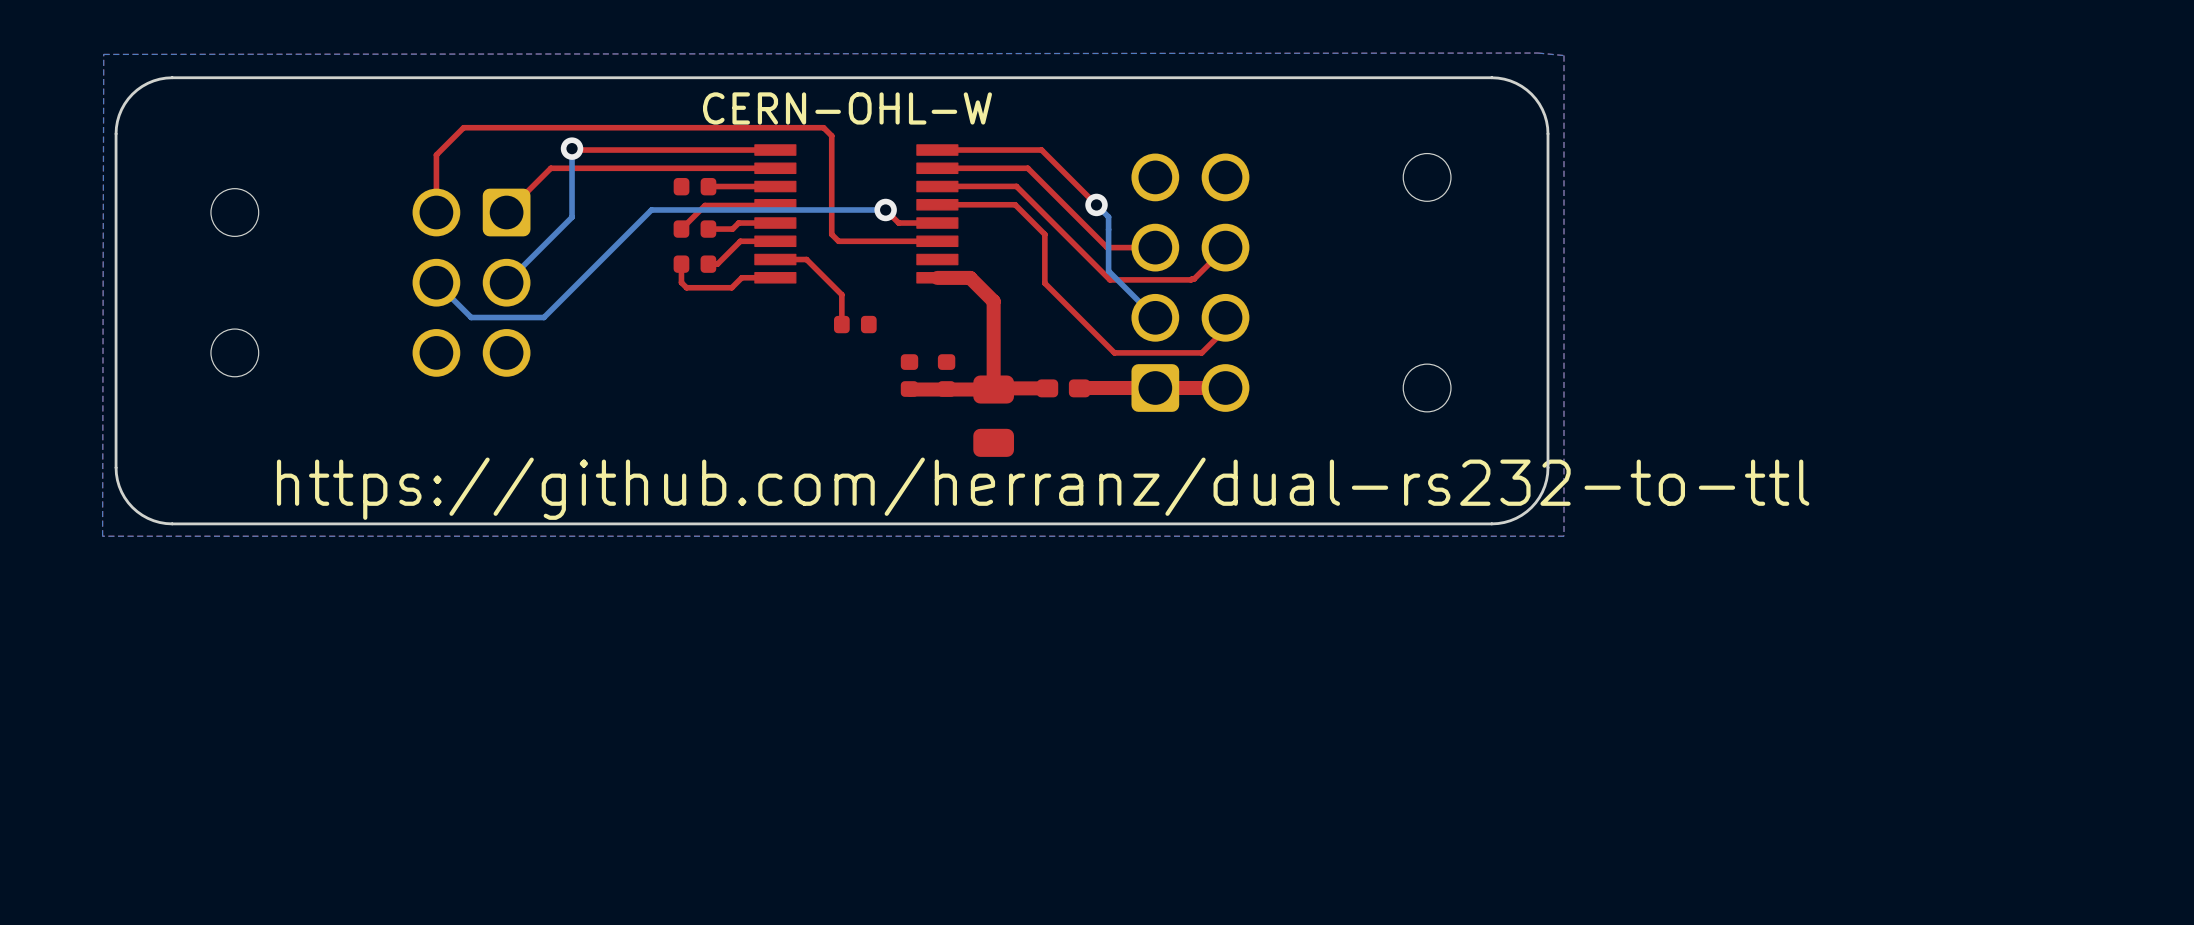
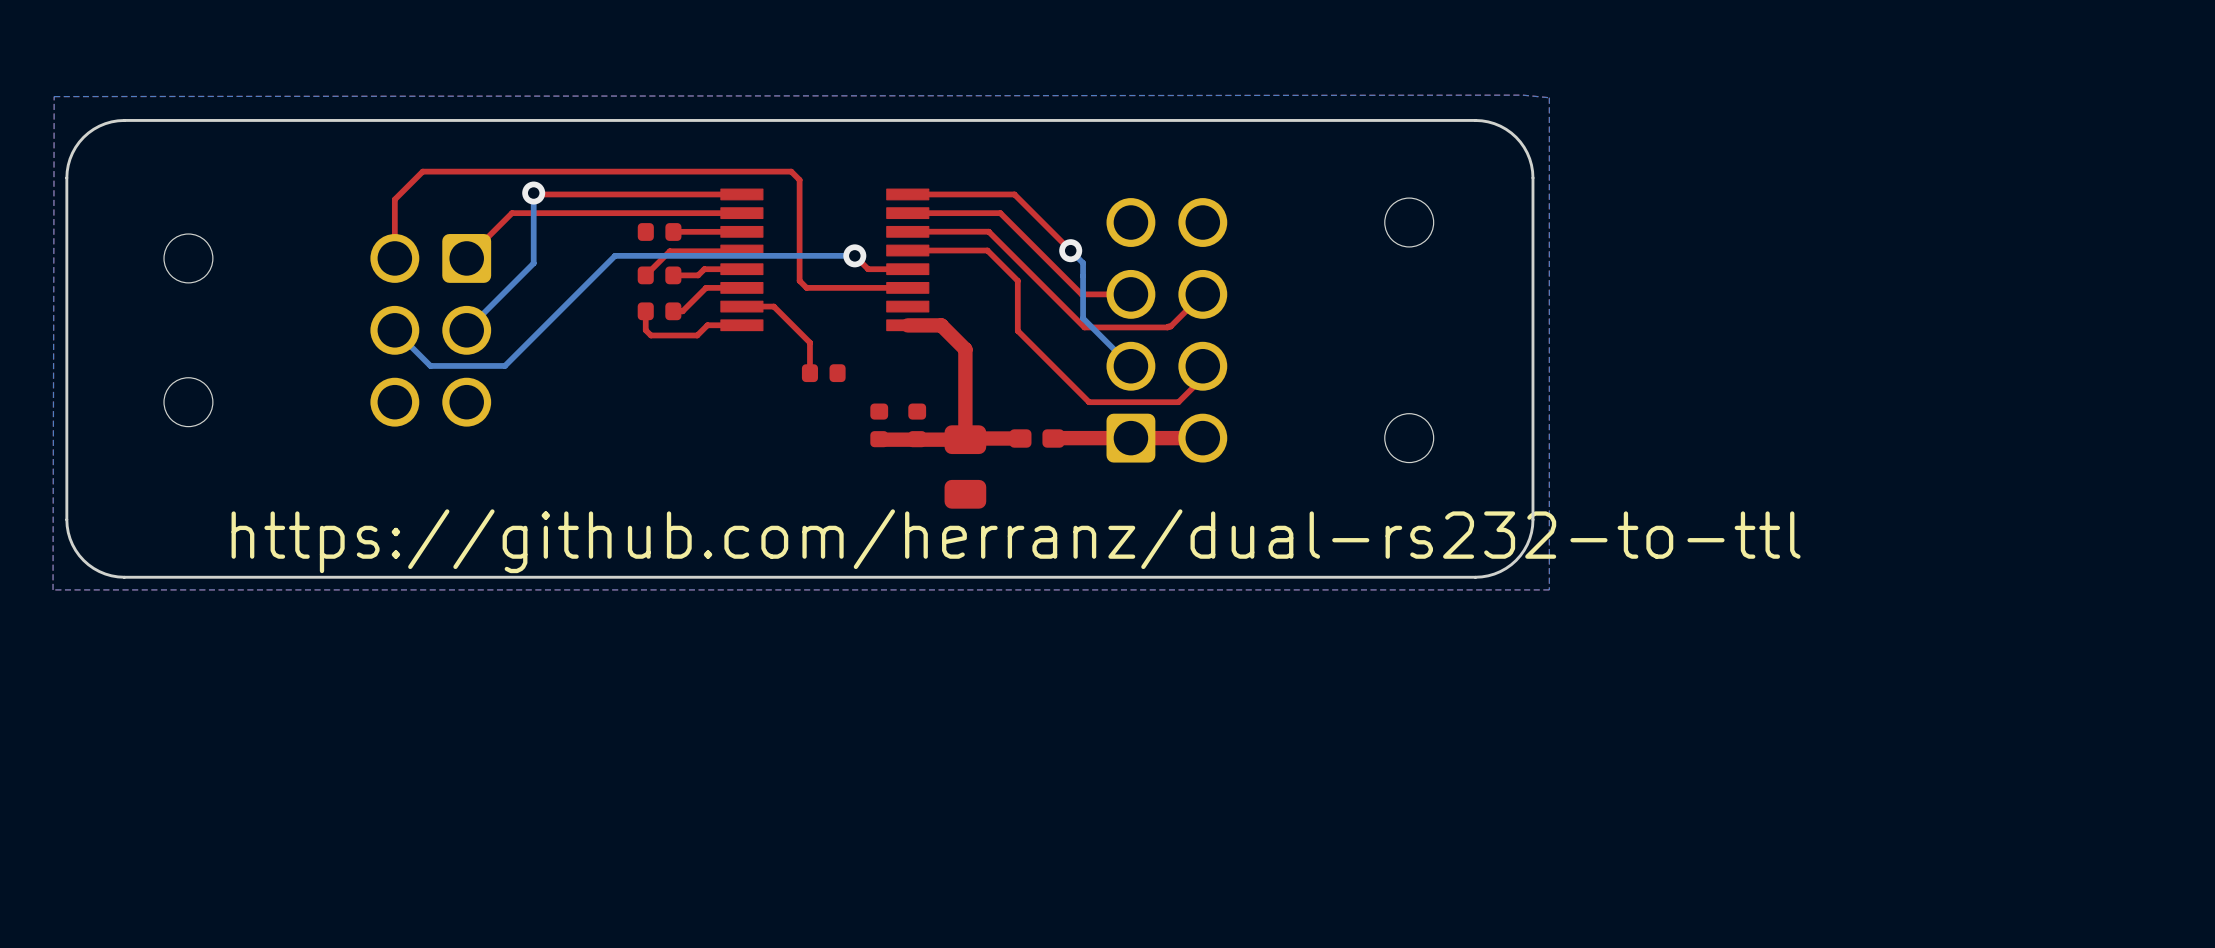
text: CERN-OHL-W (847, 108) -> none

